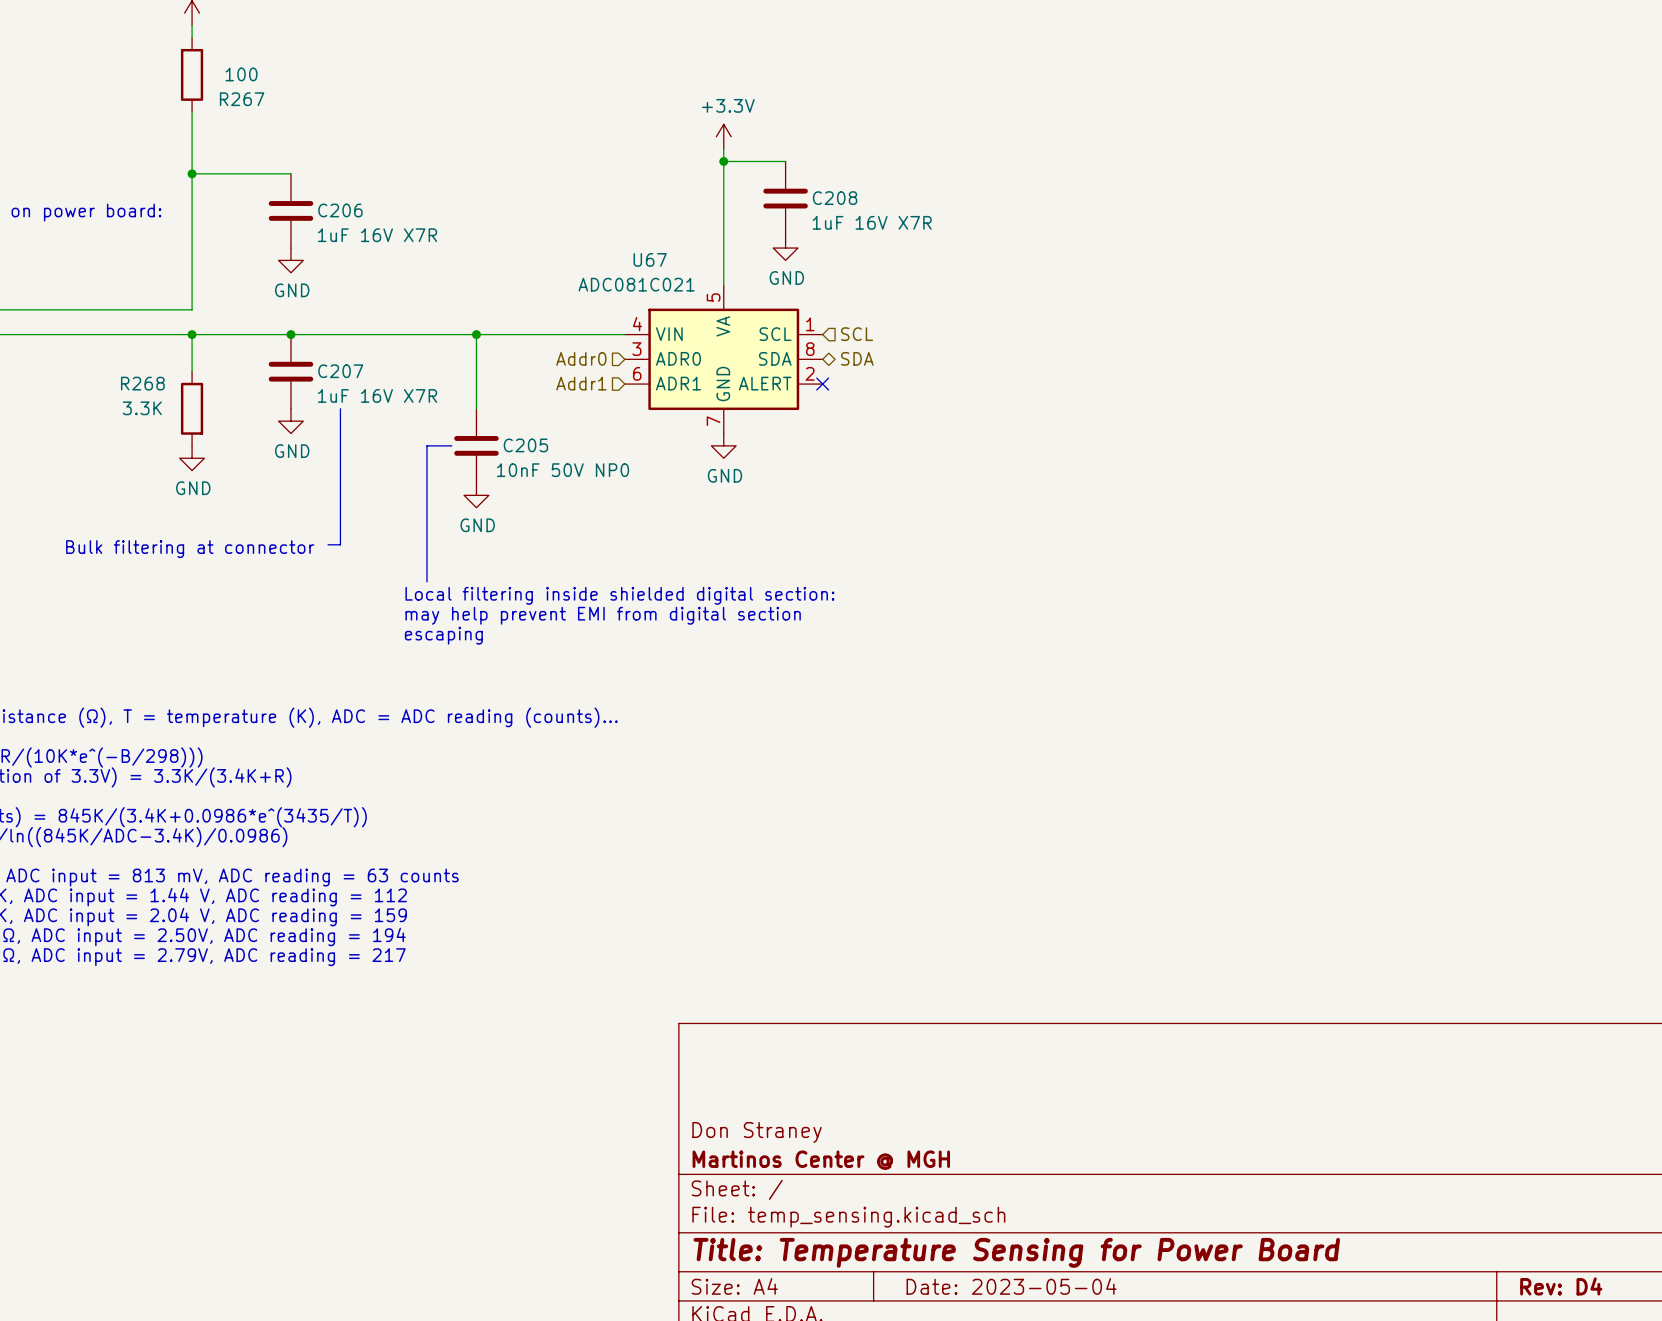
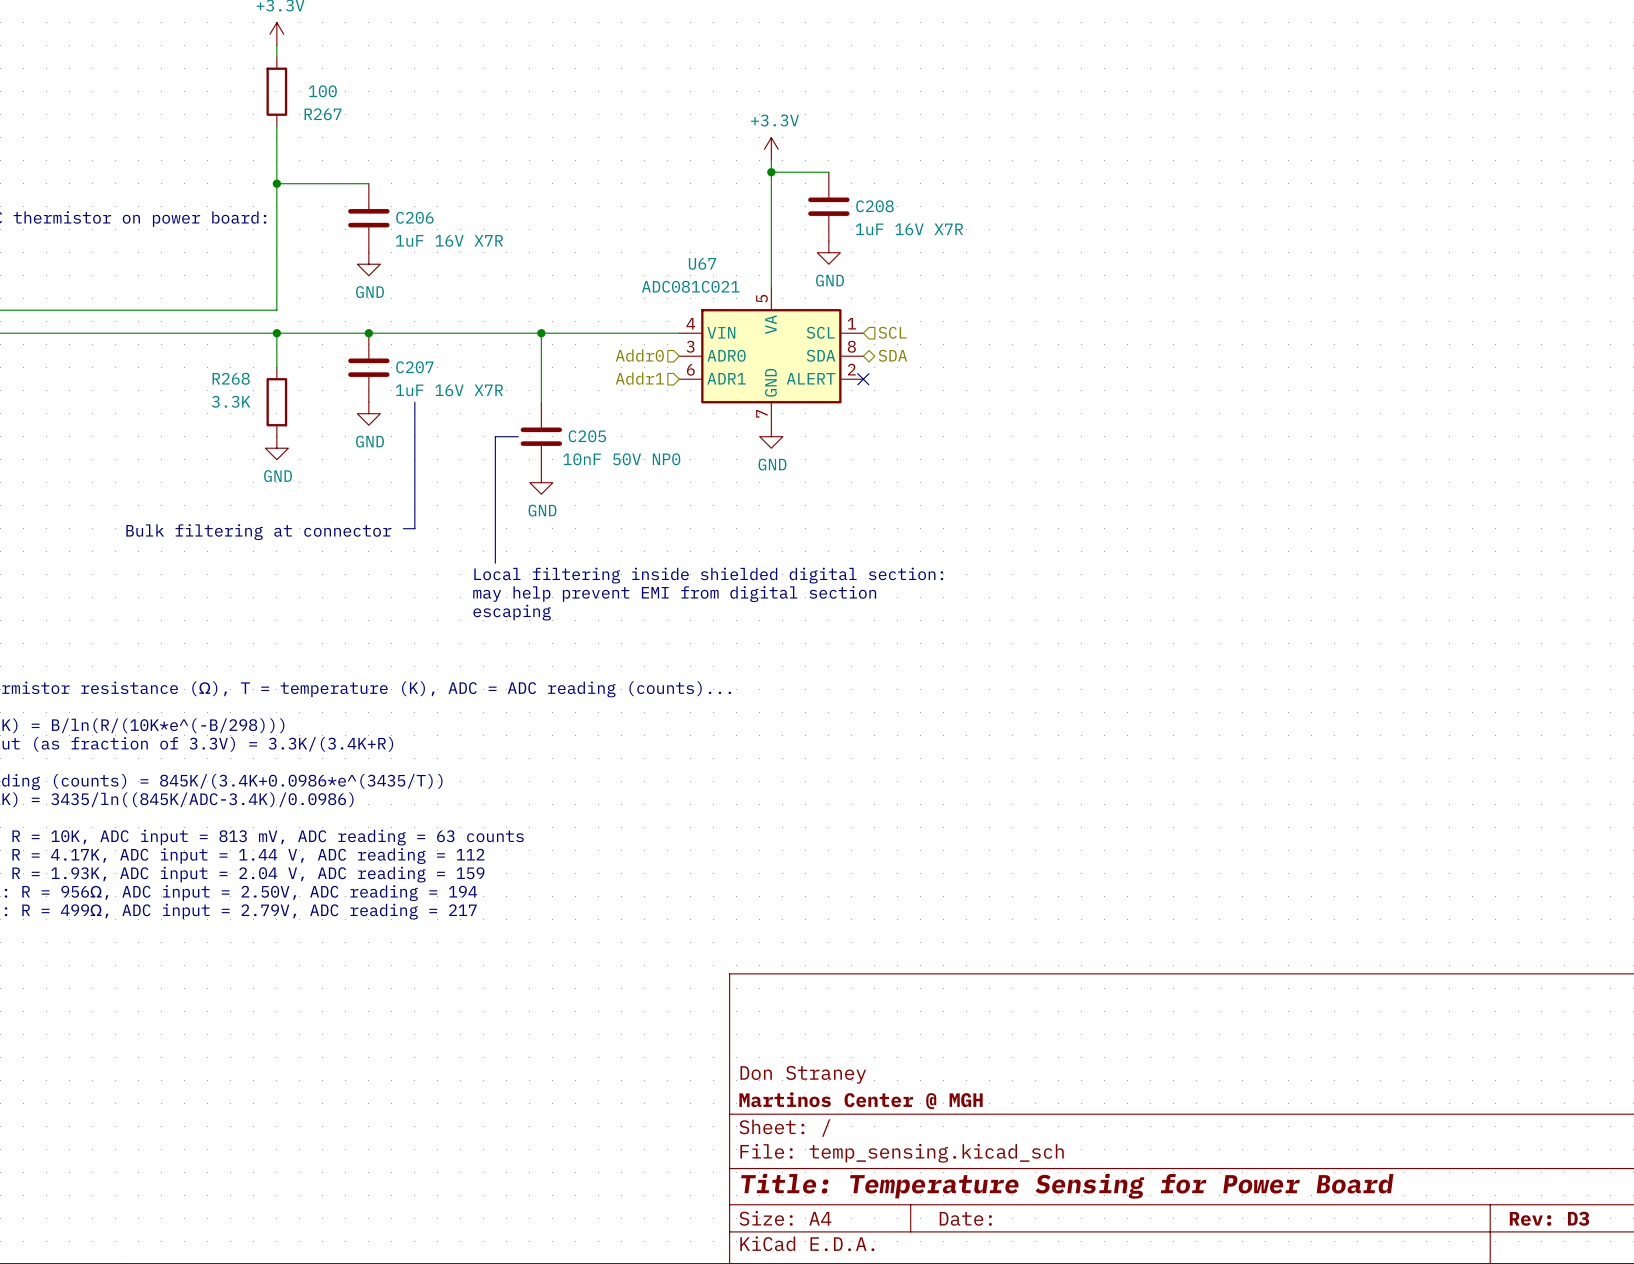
title block: Date: 2023-05-04 (1011, 1286) -> Date: (965, 1218)
title block: Rev: D4 (1561, 1286) -> Rev: D3 (1549, 1218)

